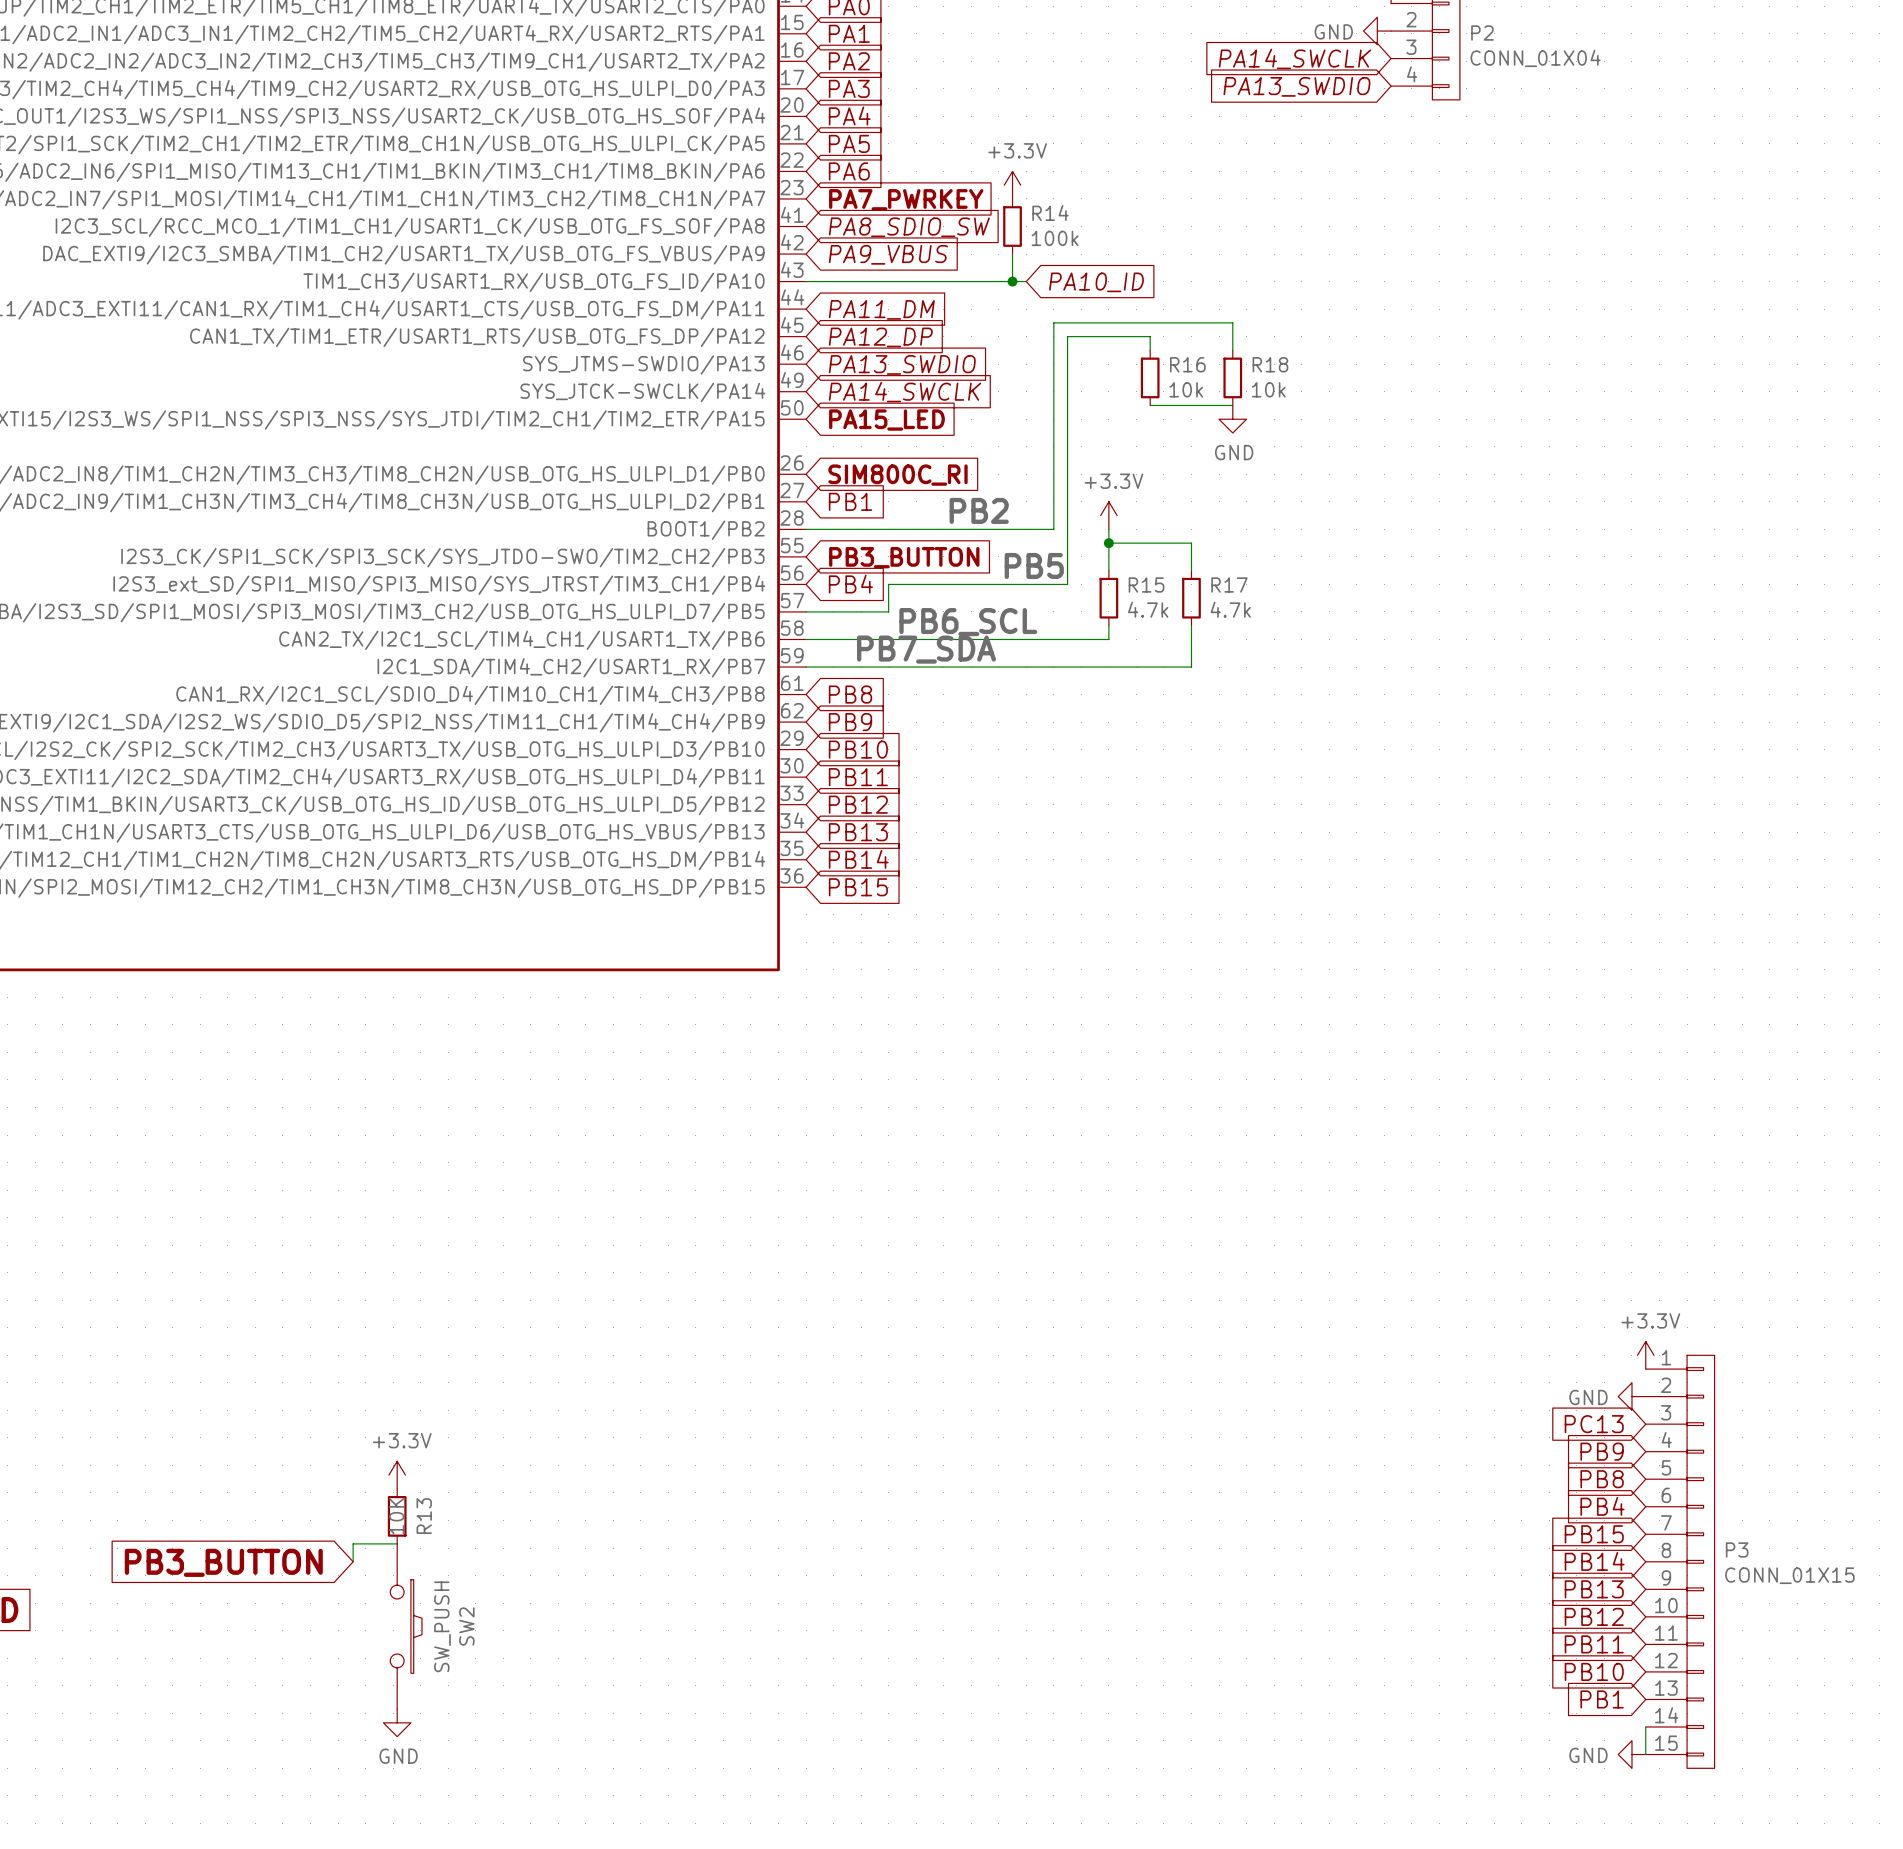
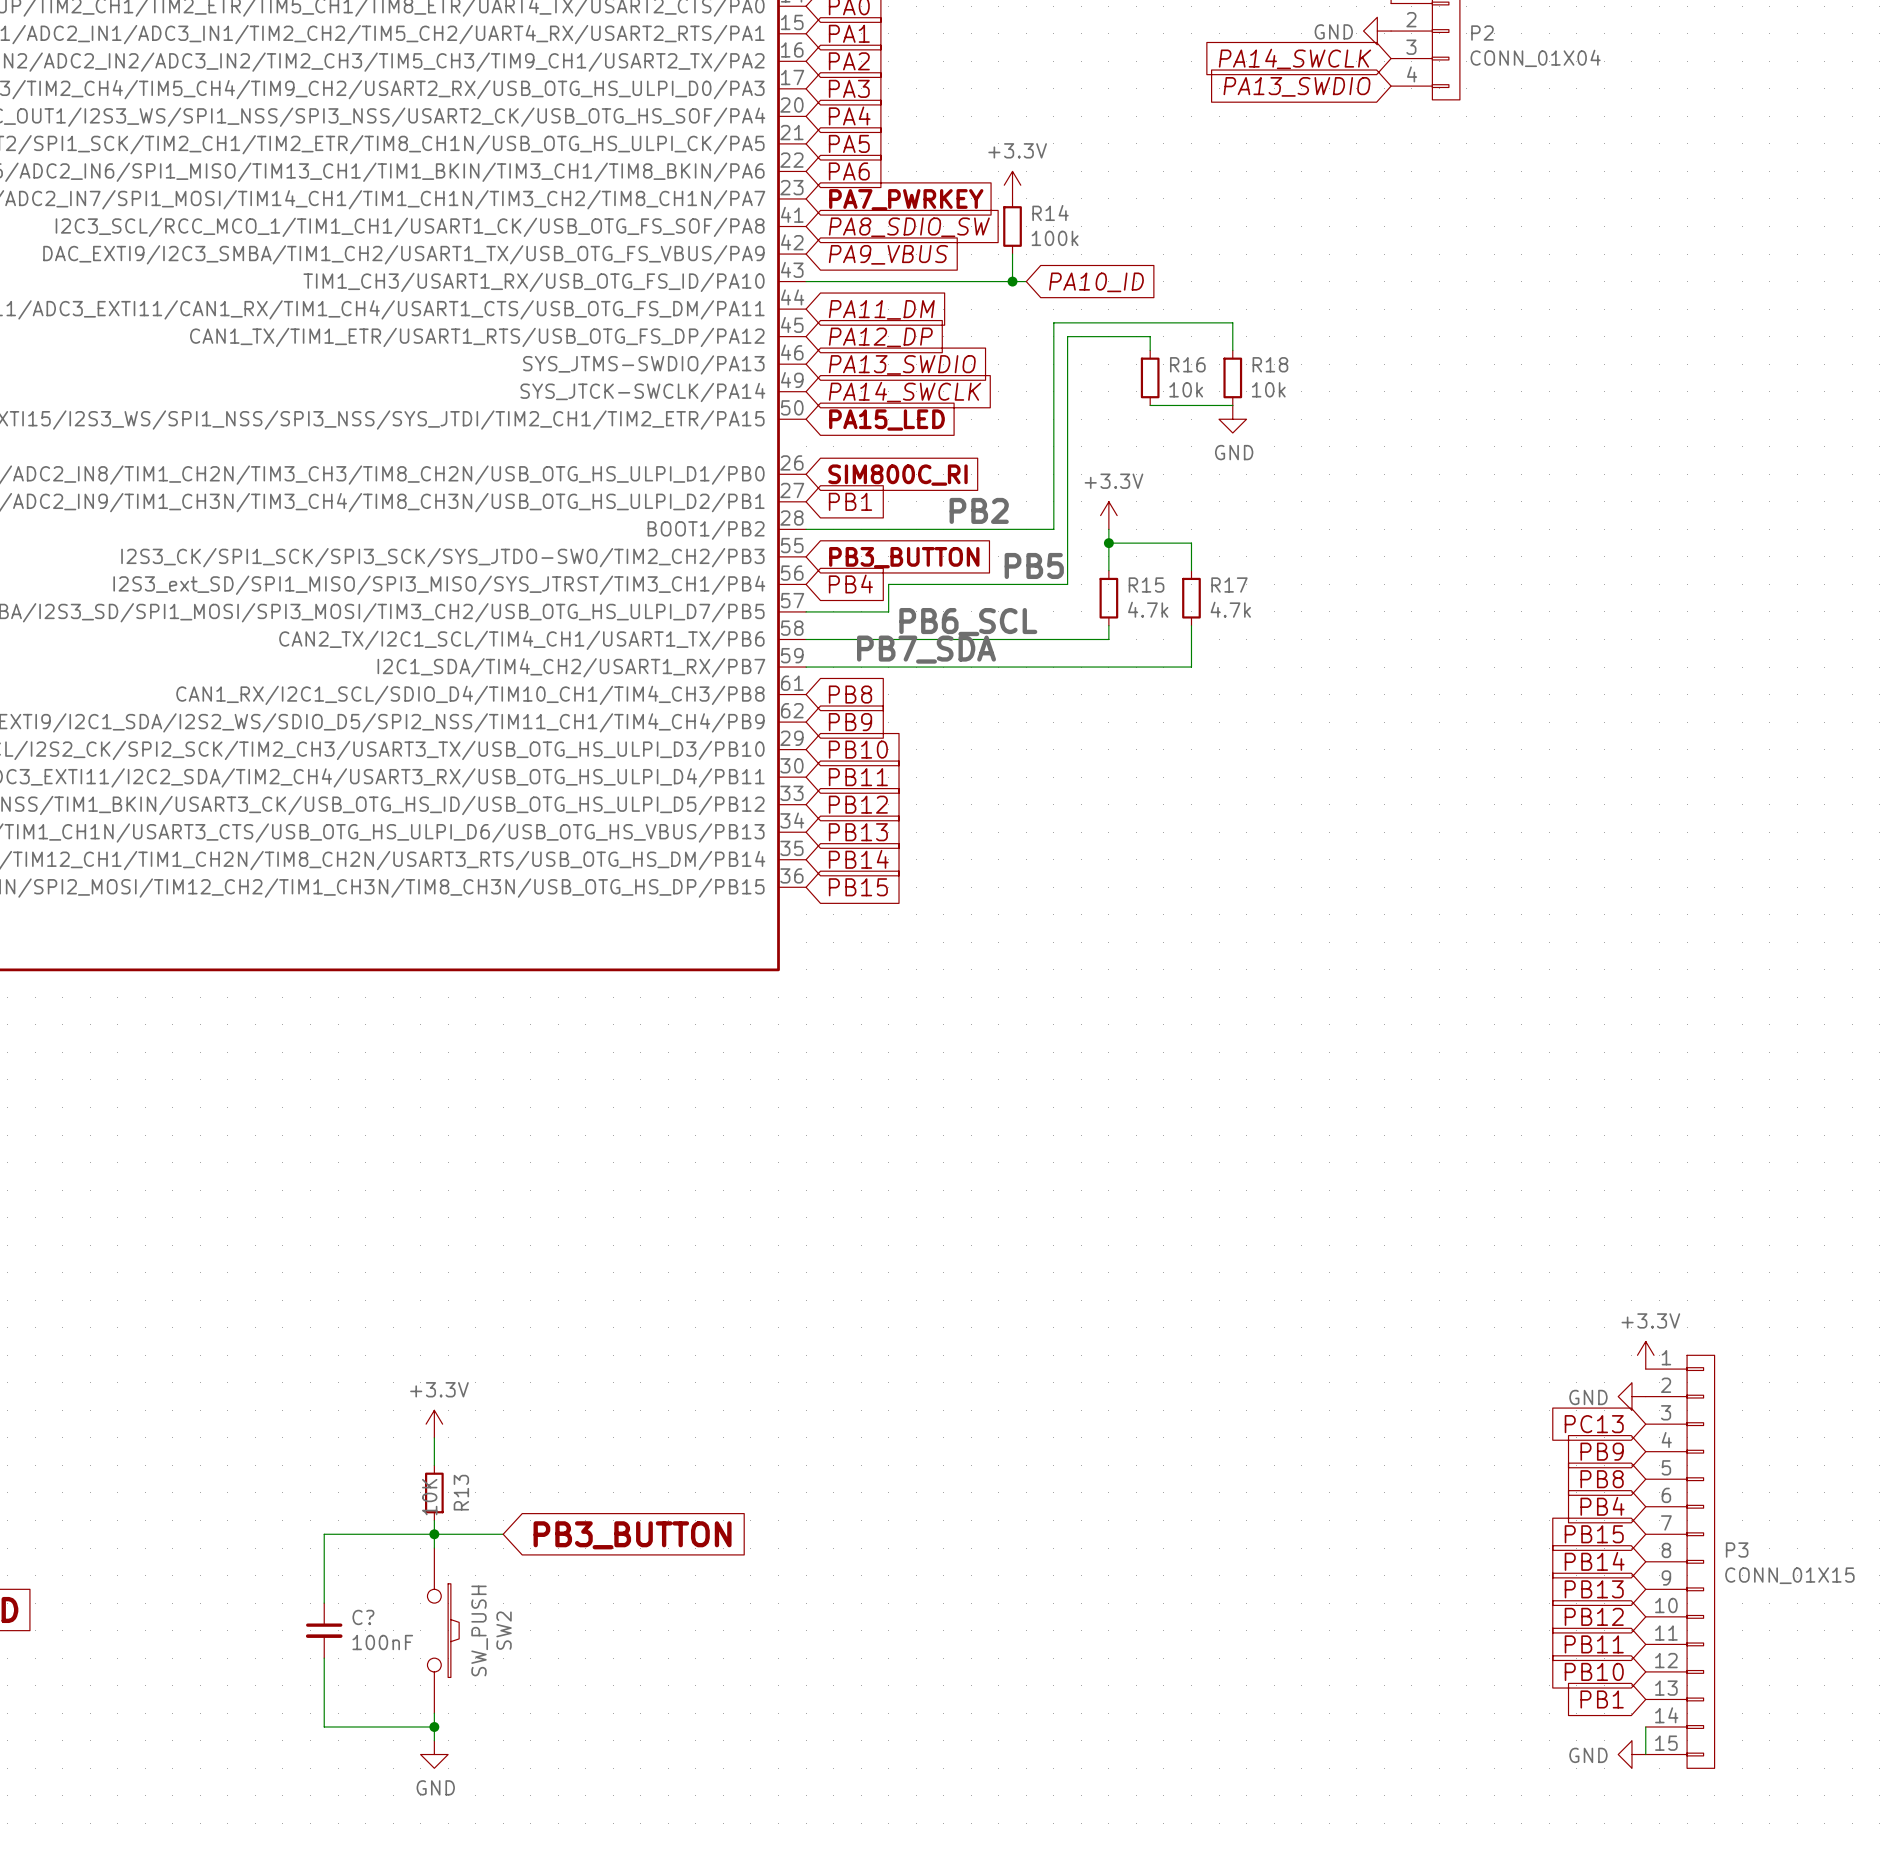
wire: none -> (434, 1437) (434, 1465)
power symbol position: +3.3V (397, 1475) -> +3.3V (434, 1424)
R13 value position: 10K (396, 1516) -> 10K (429, 1497)
R13 position: (397, 1516) -> (434, 1492)
wire: none -> (434, 1520) (434, 1548)
junction: none -> (434, 1534)
wire: none -> (503, 1534) (324, 1534) (324, 1603)
wire: (397, 1543) (353, 1543) (353, 1561) -> none
global label rotation: 0° (223, 1562) -> 180° (632, 1535)
global label position: PB3_BUTTON (223, 1562) -> PB3_BUTTON (632, 1535)
SW2 position: (406, 1626) -> (443, 1630)
C?: none -> 100nF (324, 1630)
wire: none -> (324, 1658) (324, 1726) (434, 1726)
wire: none -> (434, 1713) (434, 1740)
power symbol position: GND (397, 1722) -> GND (434, 1754)
junction: none -> (434, 1726)

